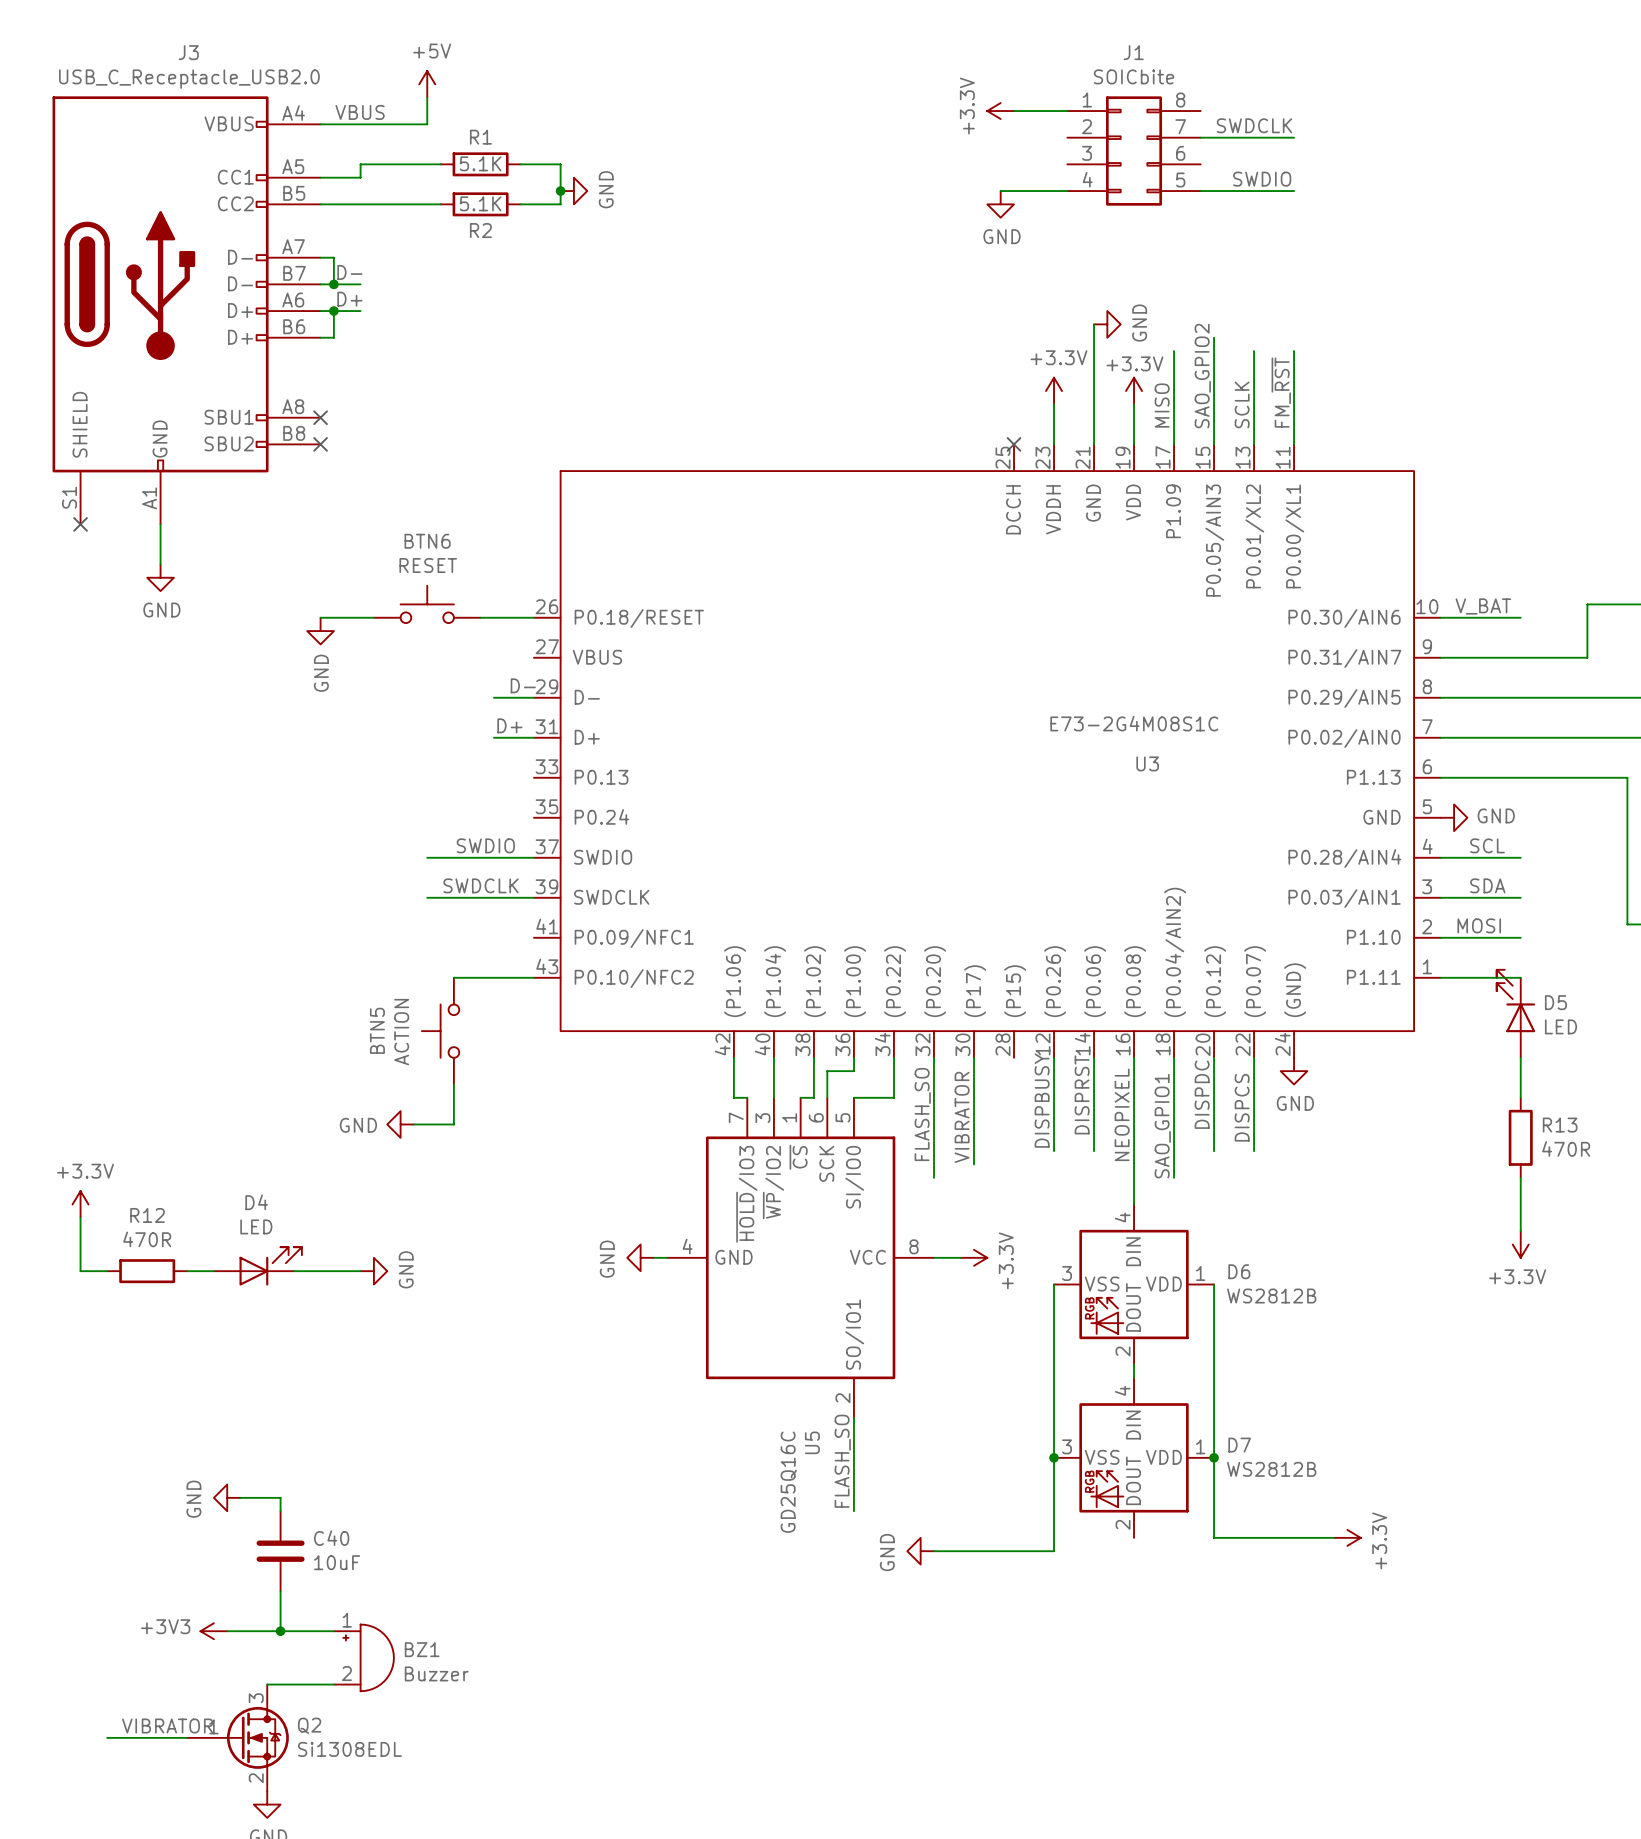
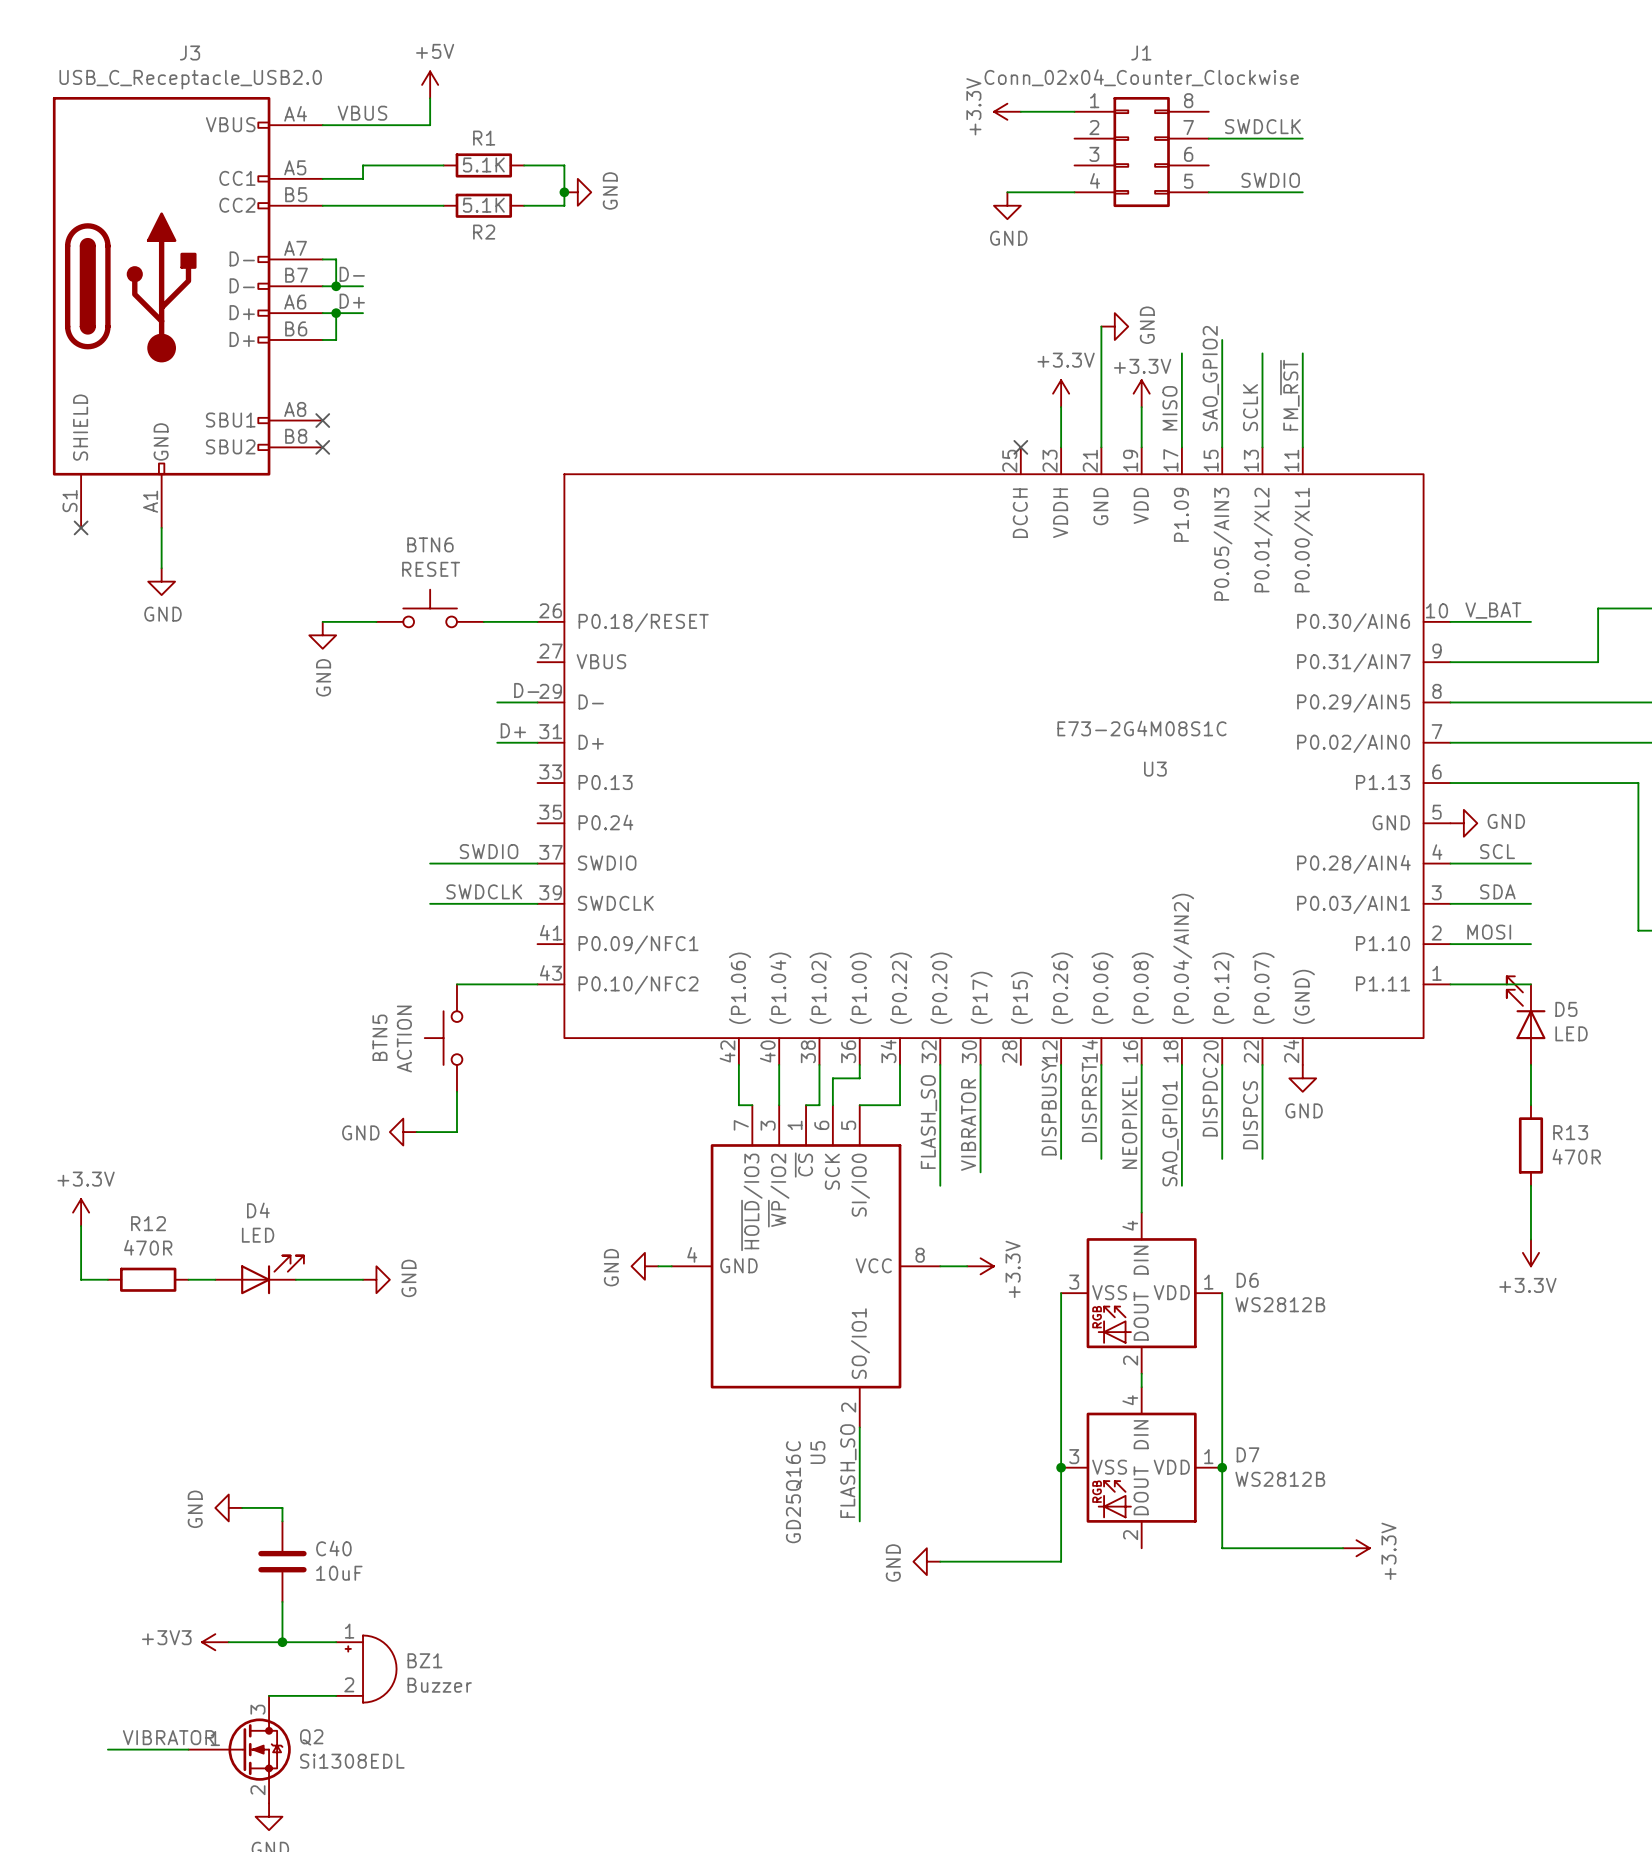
J1 value: SOICbite (1134, 76) -> Conn_02x04_Counter_Clockwise (1141, 77)

